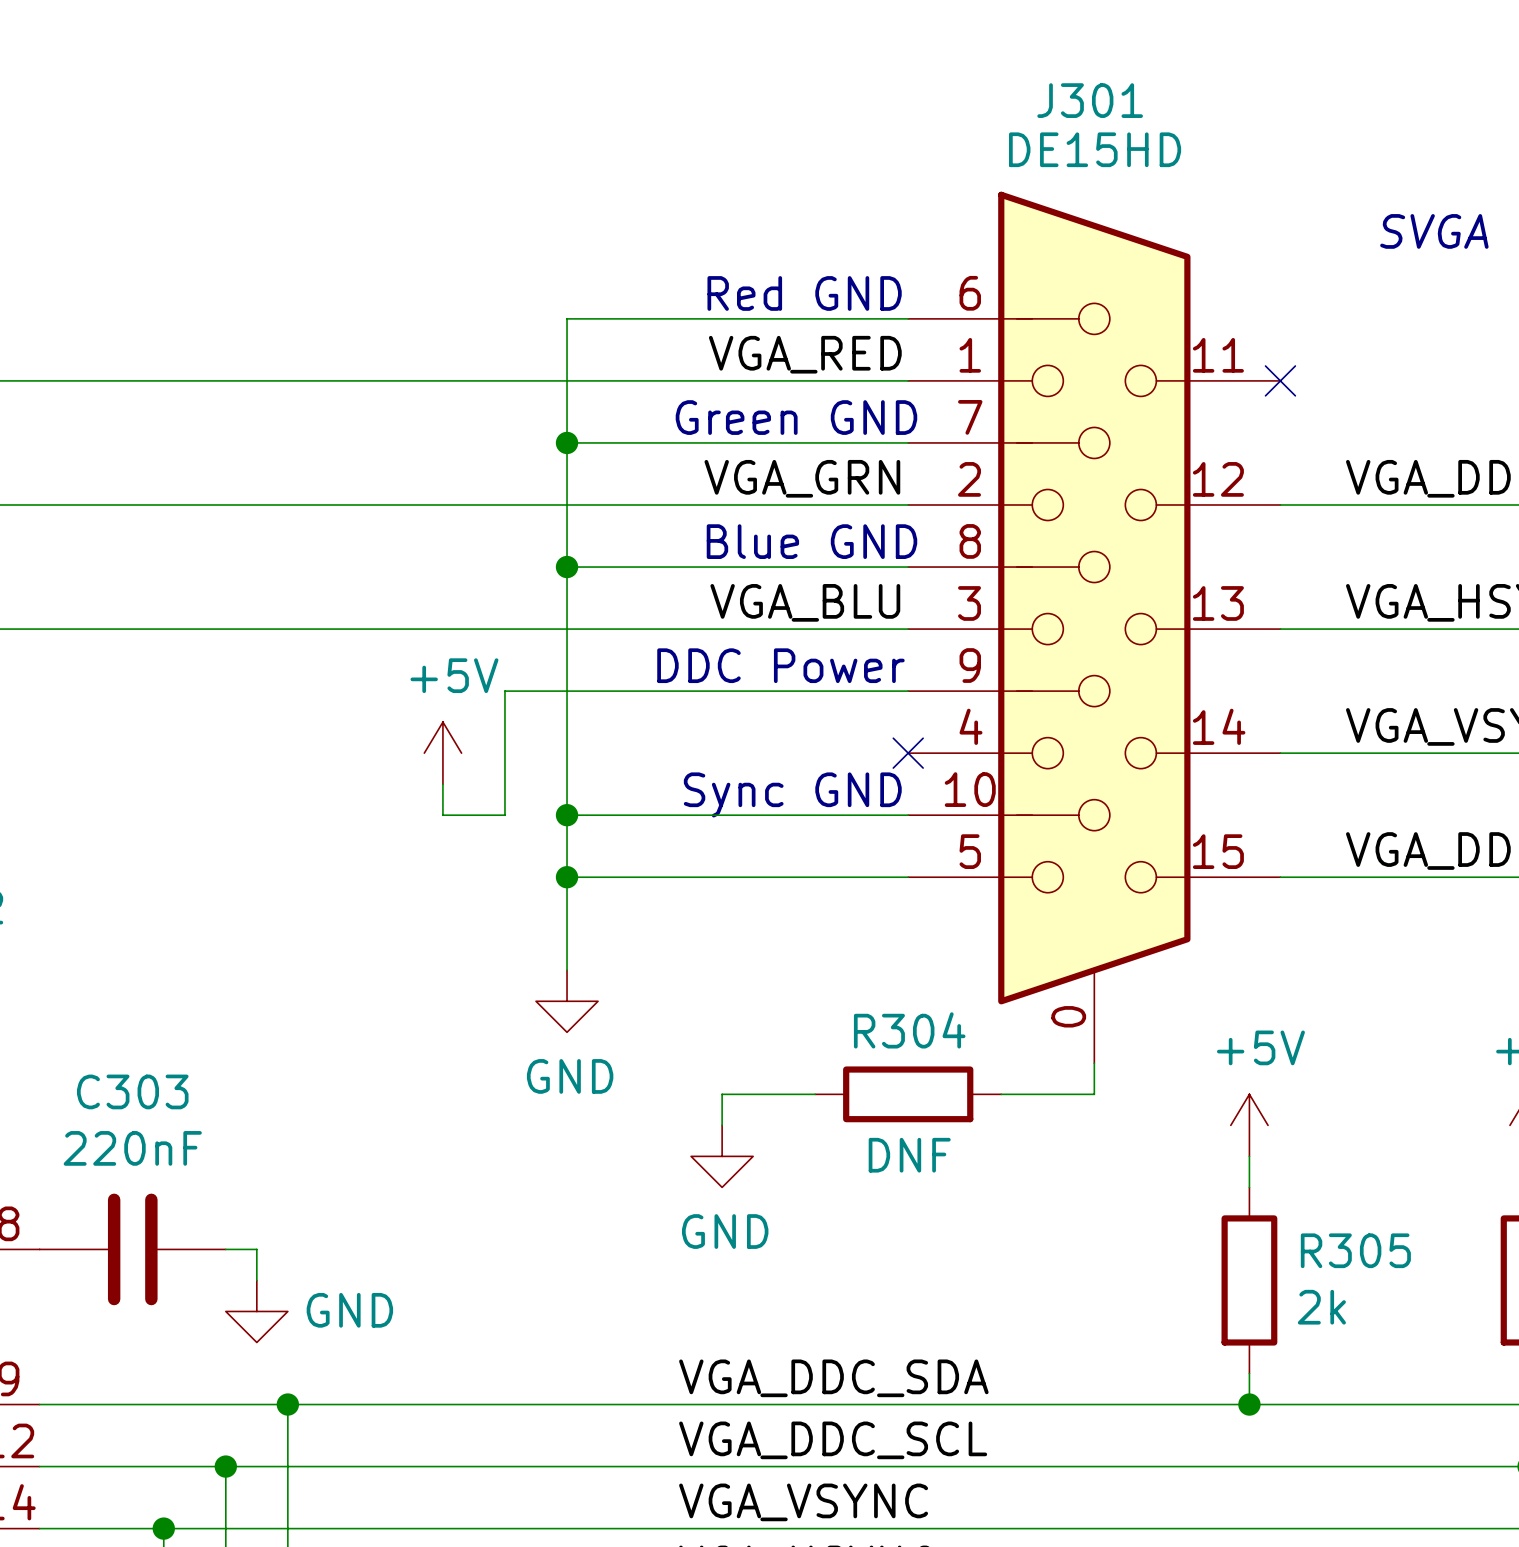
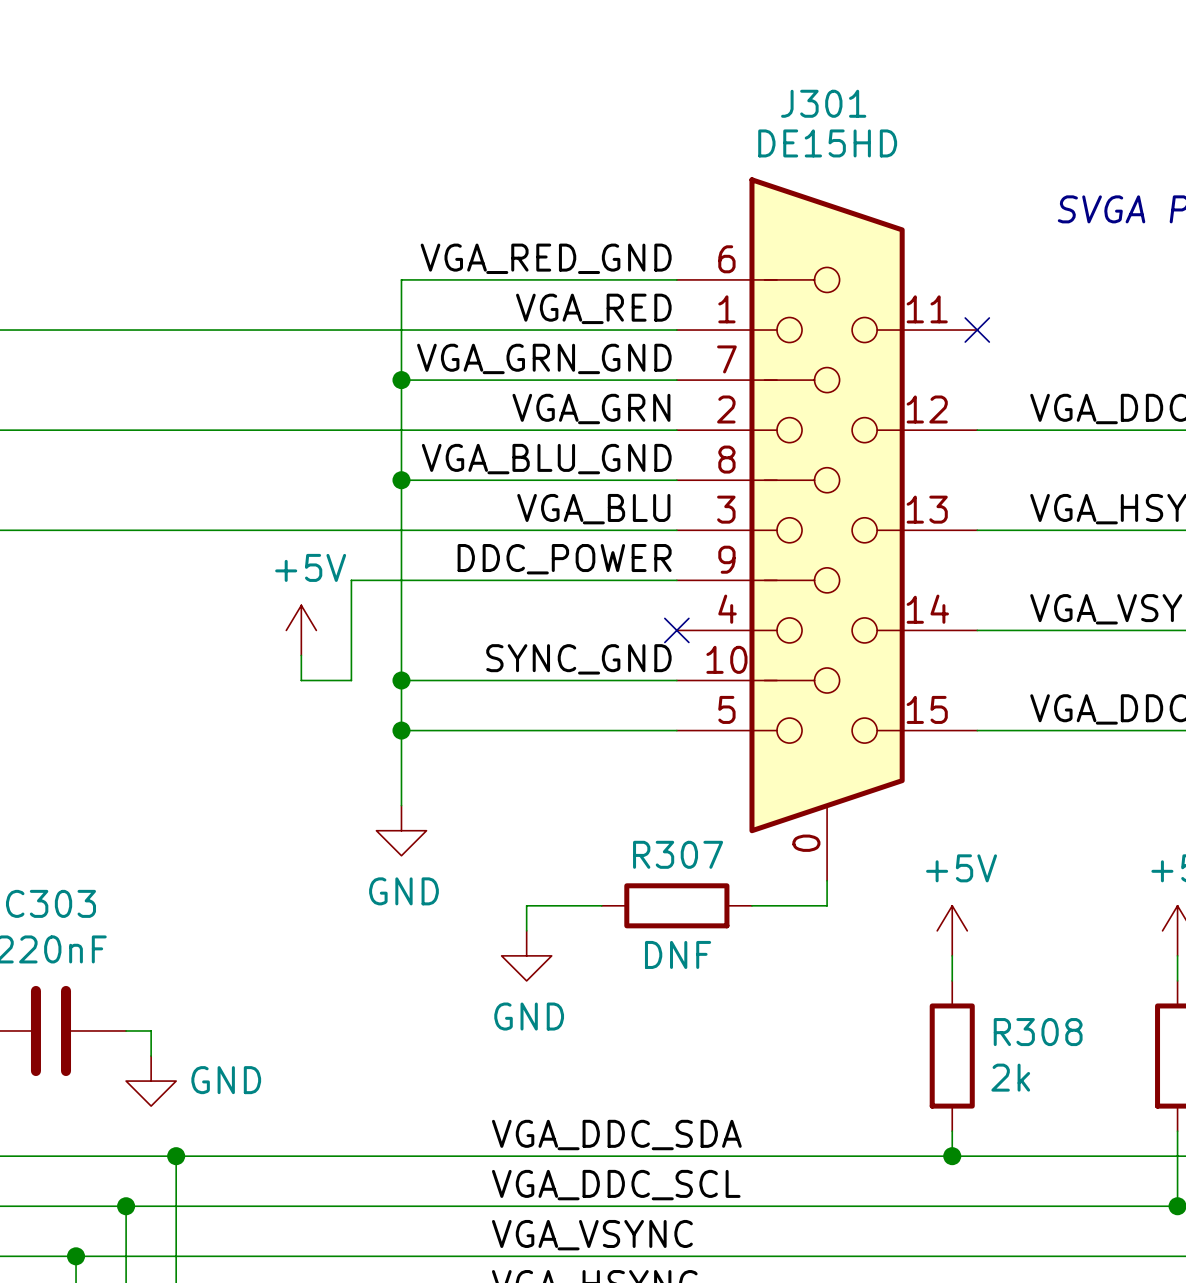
label: none -> VGA_RED_GND (546, 258)
text: Red GND (804, 293) -> none
label: none -> VGA_GRN_GND (544, 358)
text: Green GND (796, 417) -> none
label: none -> VGA_BLU_GND (546, 459)
text: Blue GND (811, 541) -> none
label: none -> DDC_POWER (564, 559)
text: DDC Power (780, 665) -> none
label: none -> SYNC_GND (578, 659)
text: Sync GND (792, 794) -> none
R304 name: R304 (909, 1030) -> R307 (678, 854)
R305 name: R305 (1355, 1250) -> R308 (1038, 1032)

